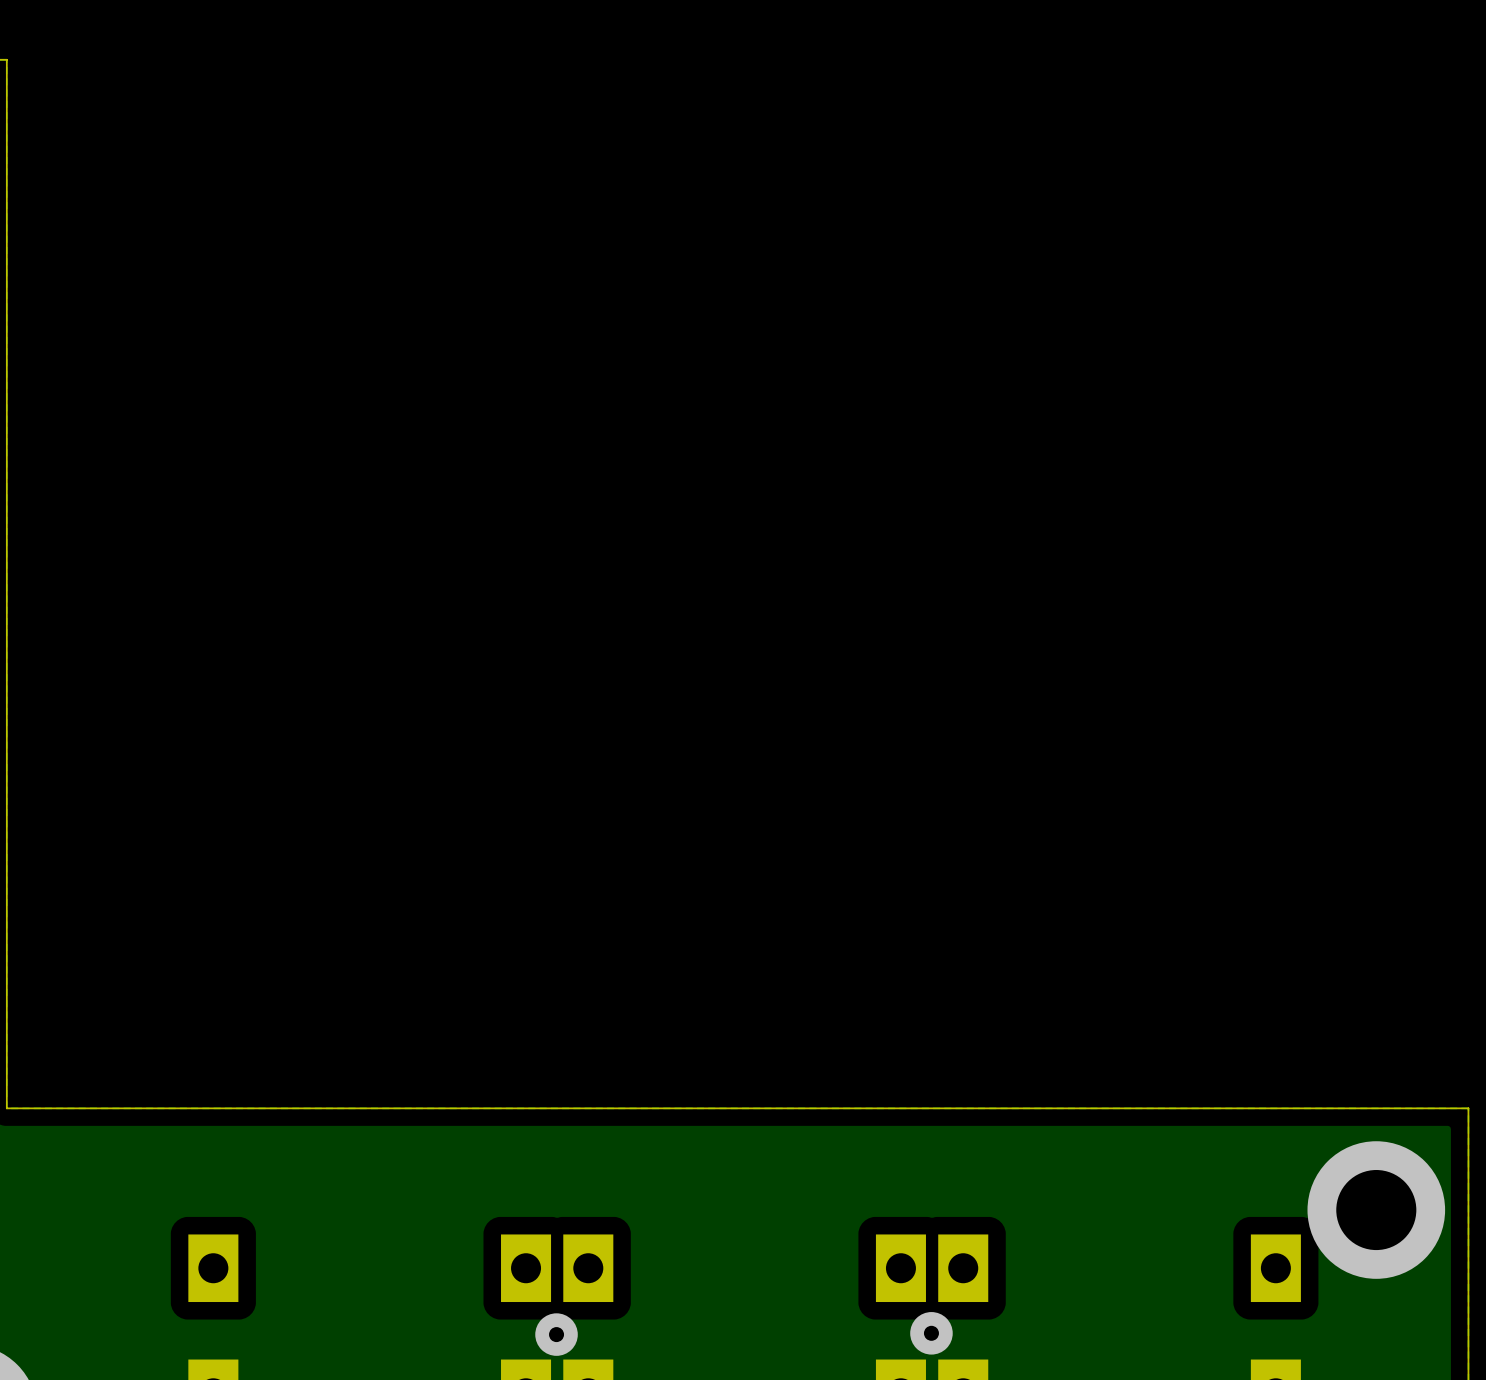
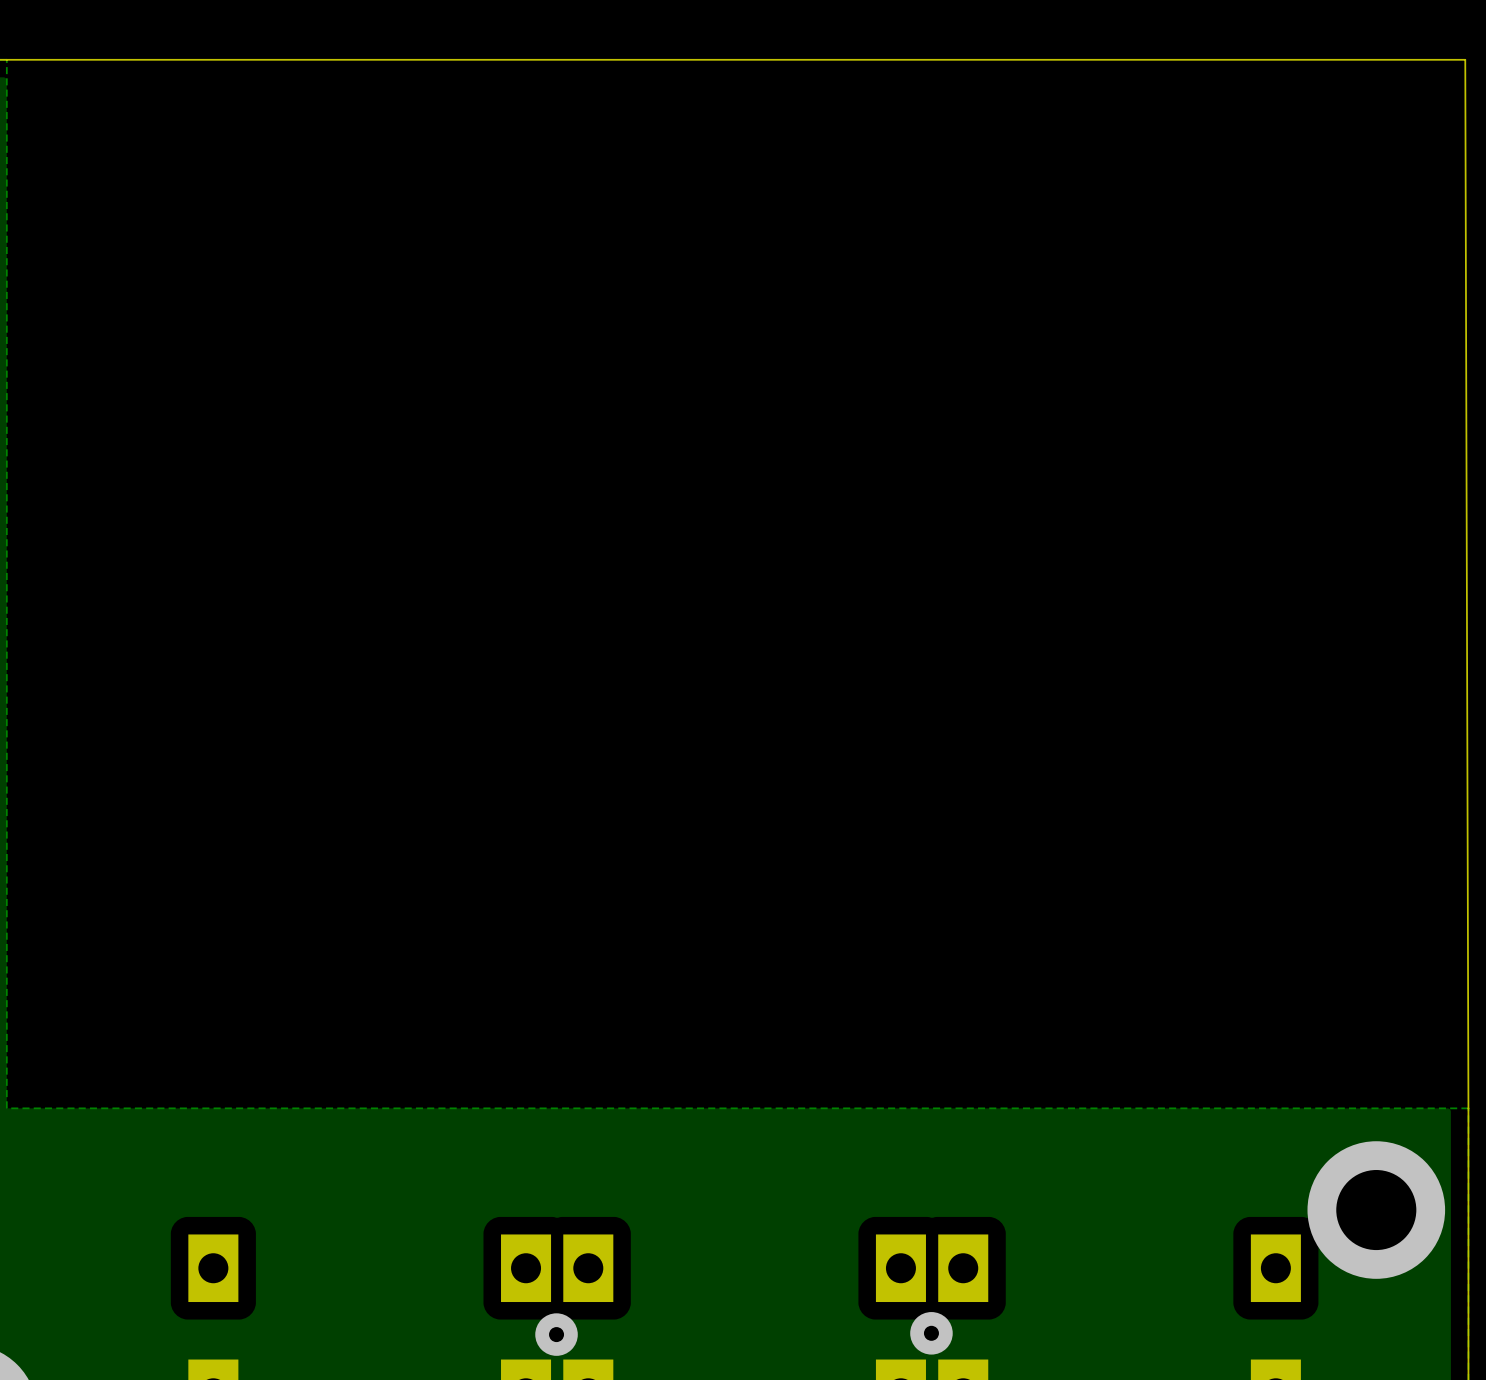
board edge: (6, 59) (6, 1108) (1468, 1108) -> (6, 59) (1465, 59) (1468, 1108)

